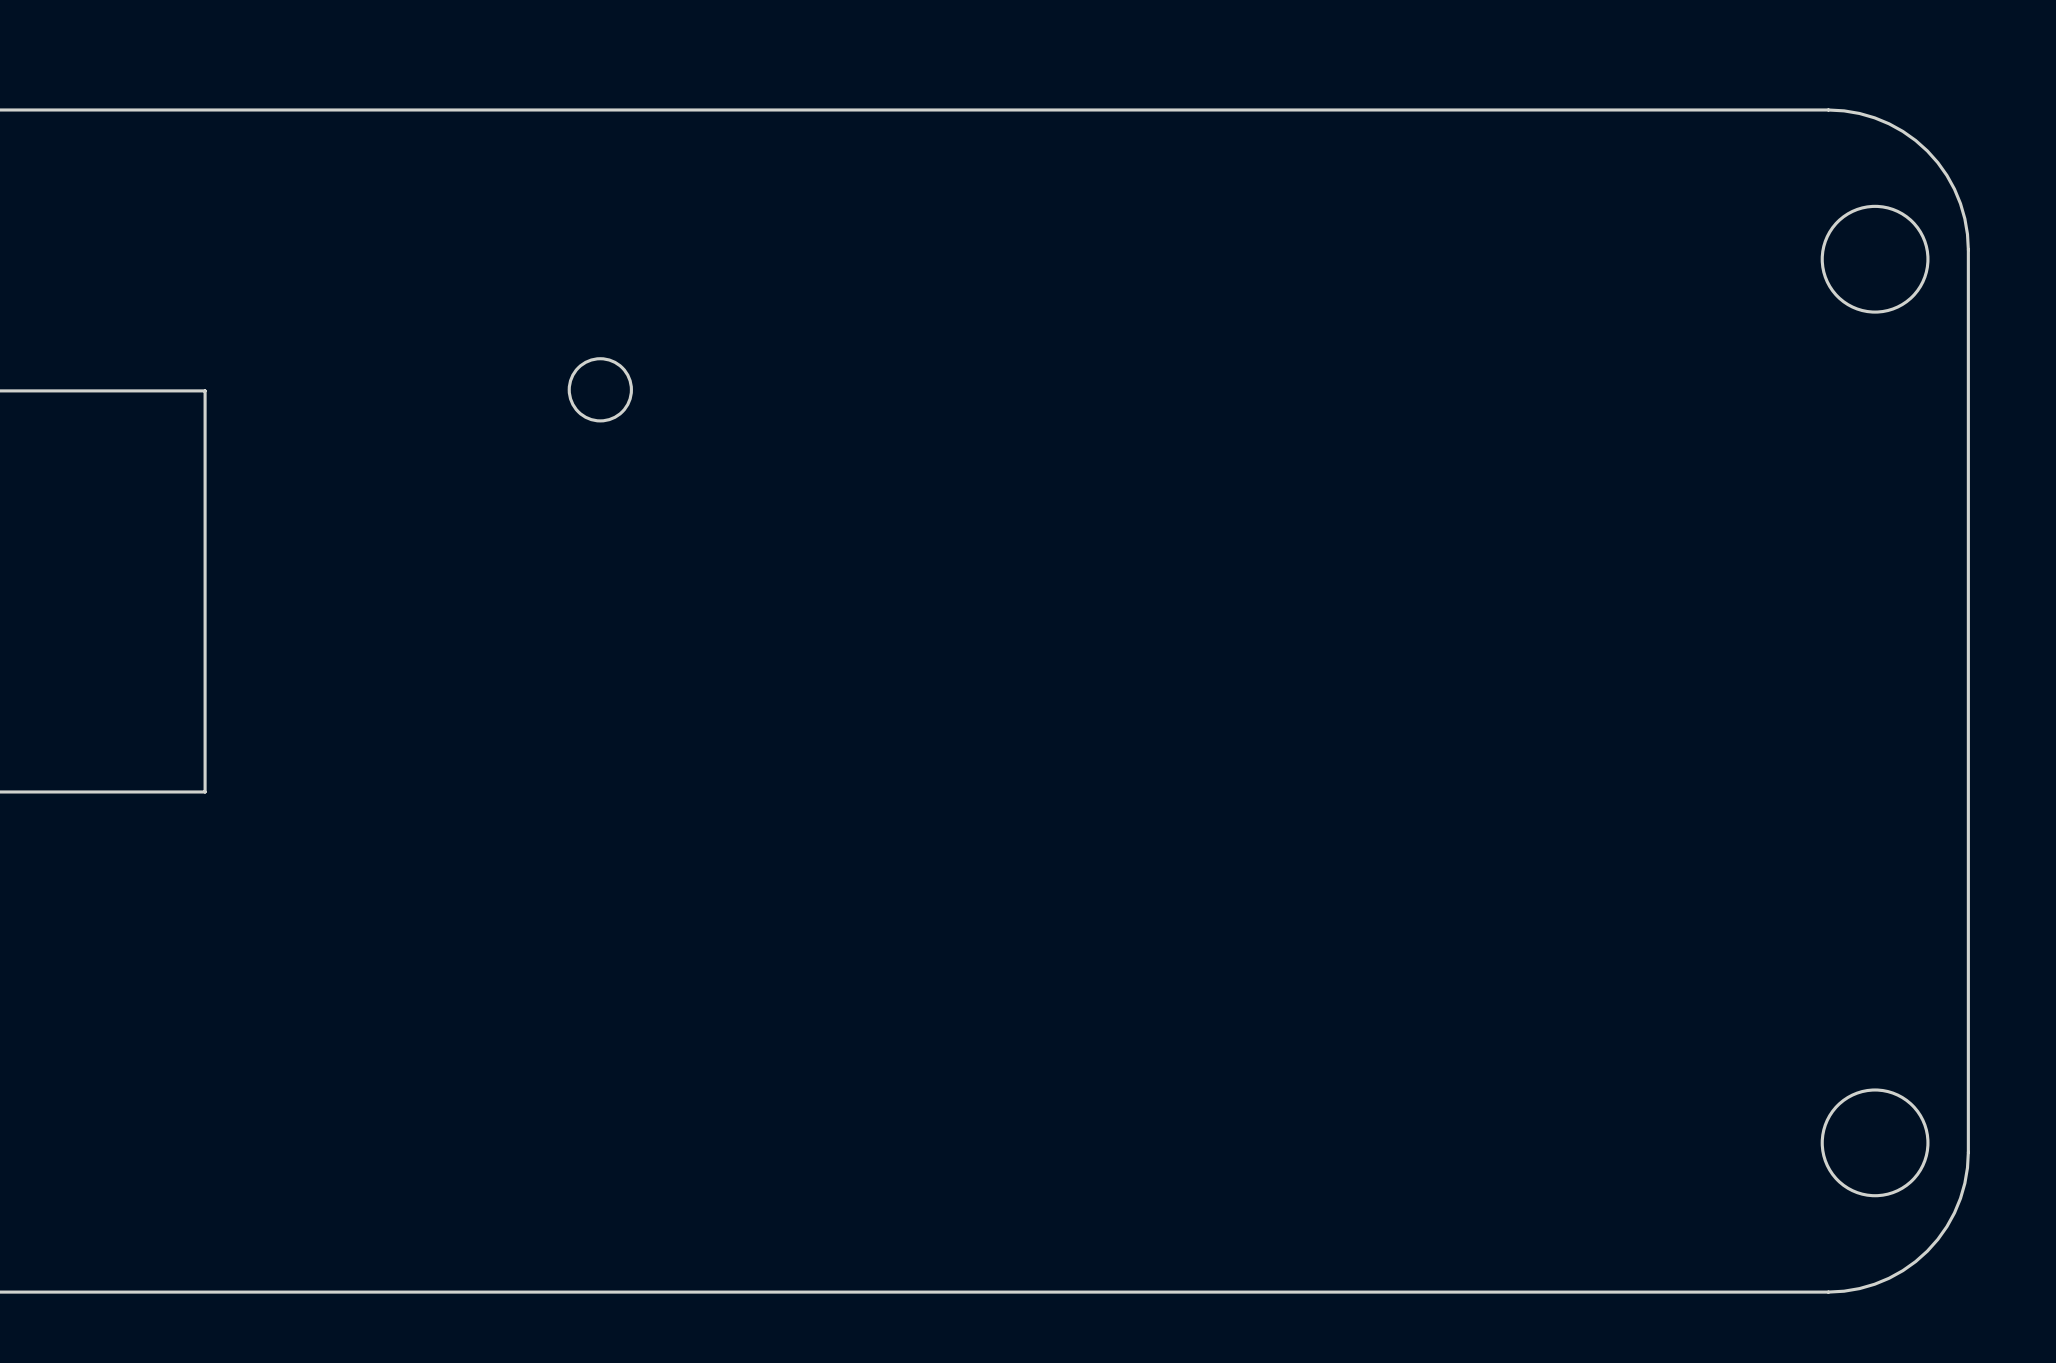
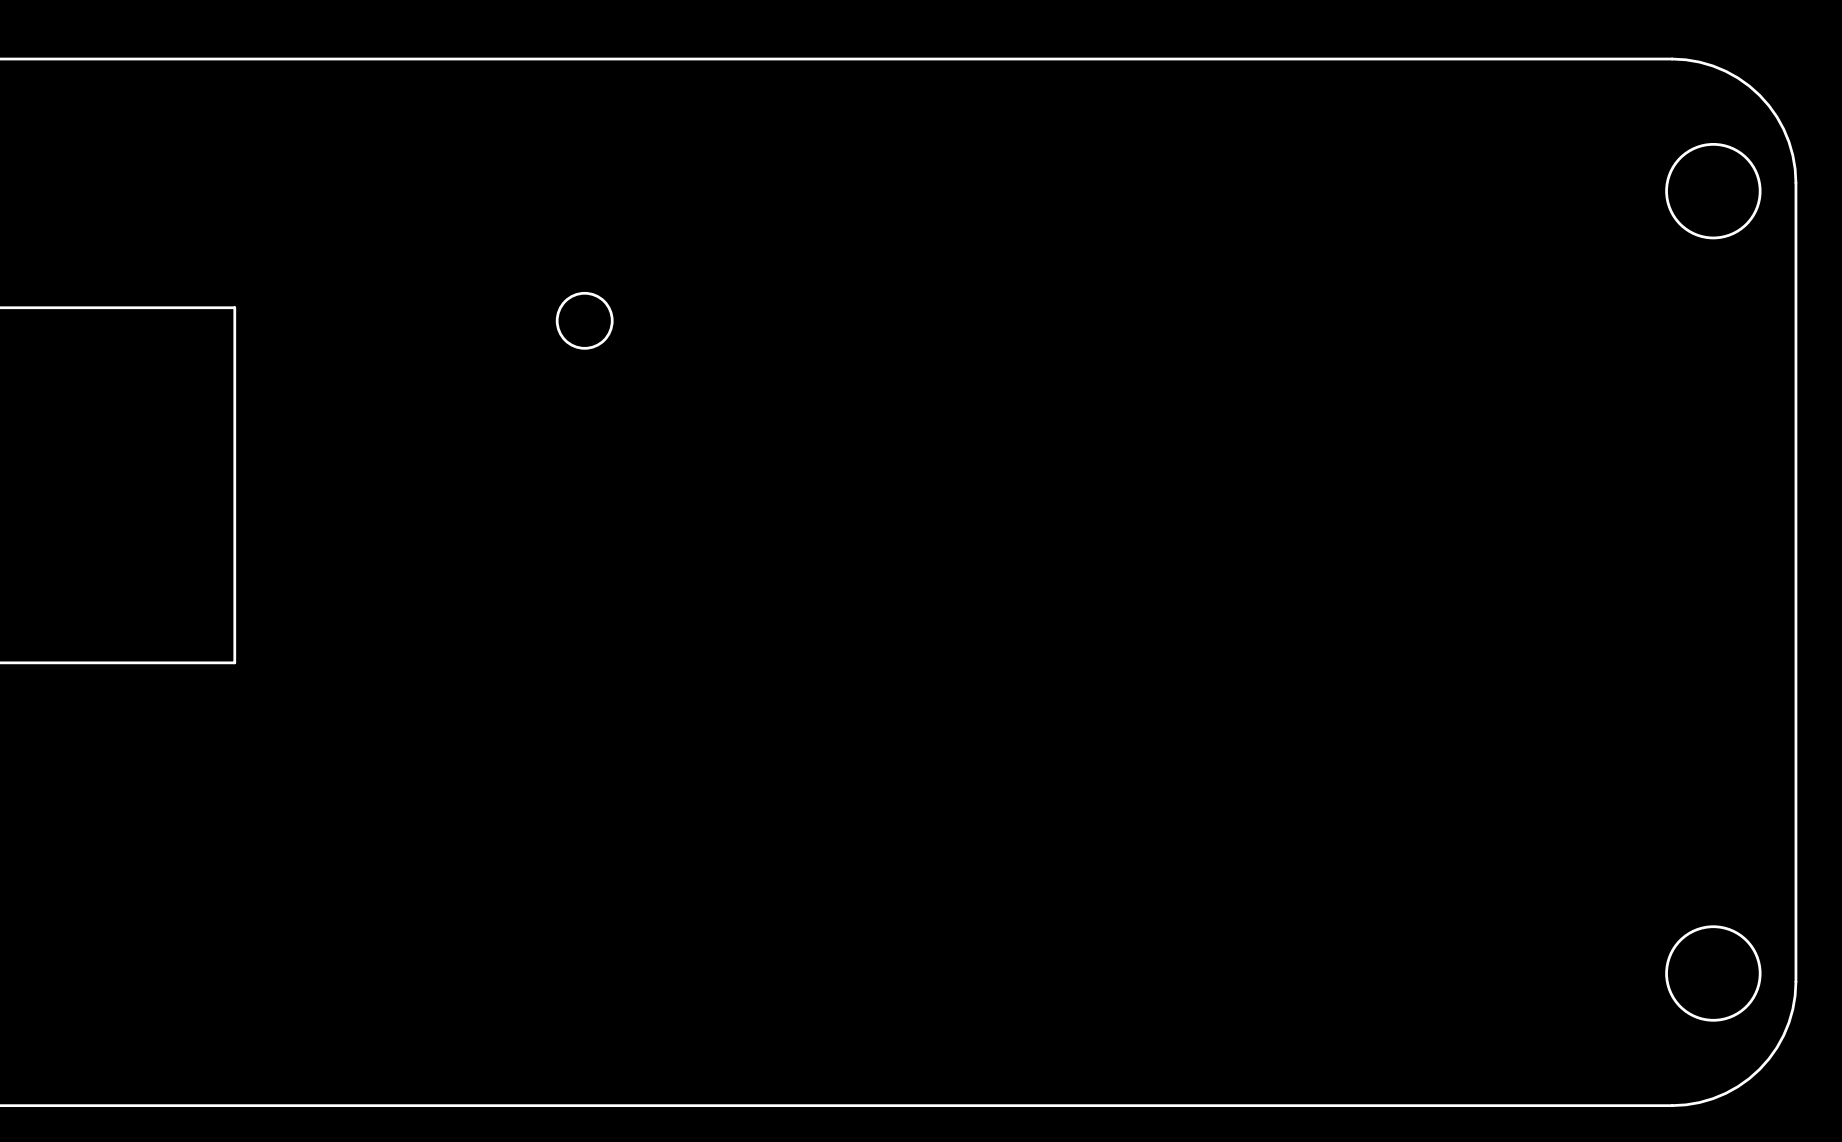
round board edge position: (600, 389) -> (584, 320)

